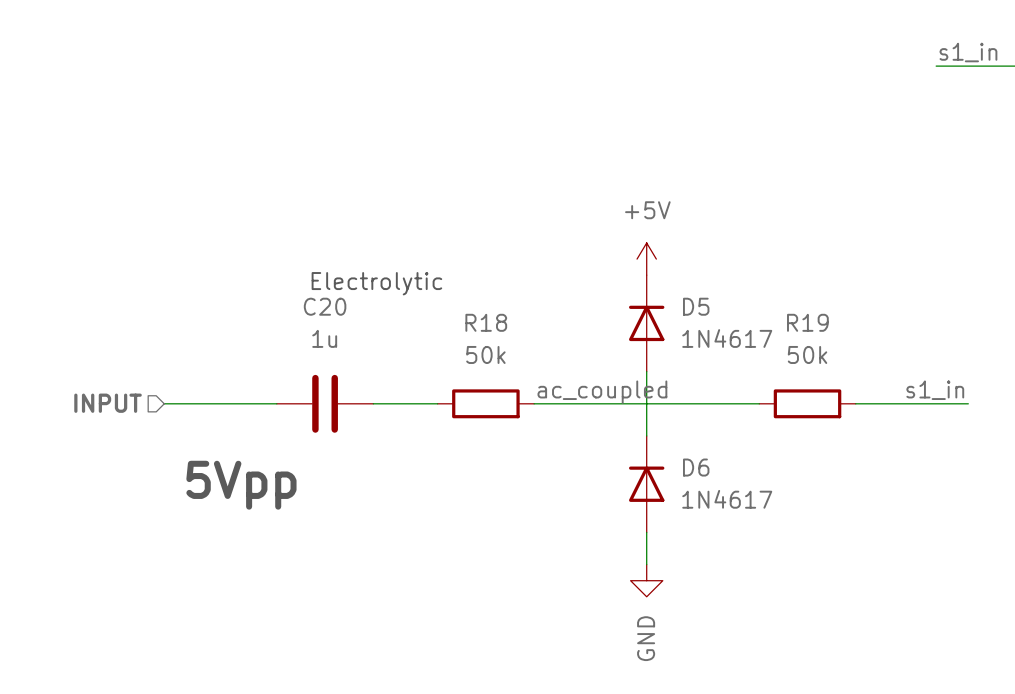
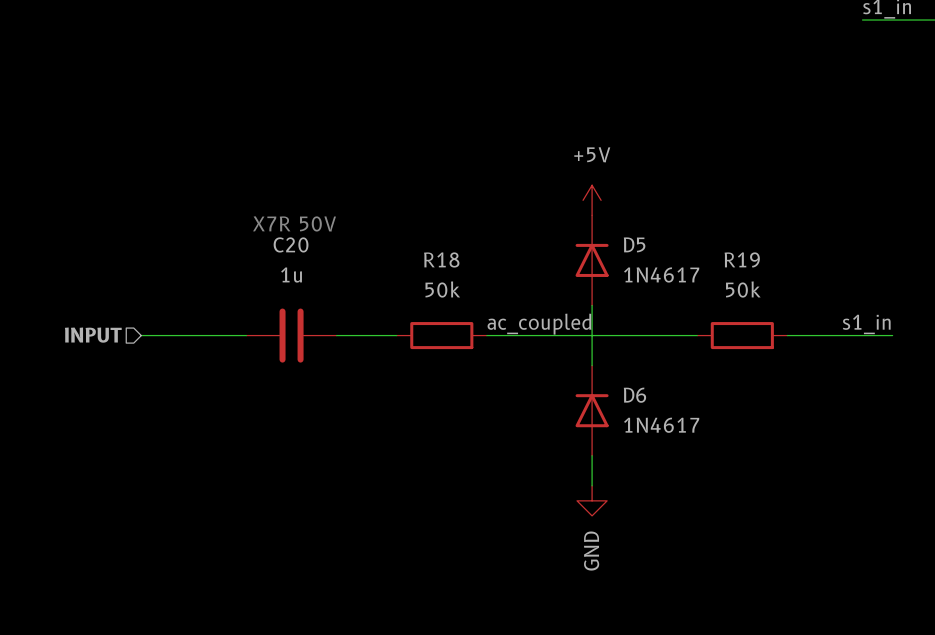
text: Electrolytic (376, 283) -> none
text: none -> X7R 50V (294, 223)
text: 5Vpp (241, 485) -> none

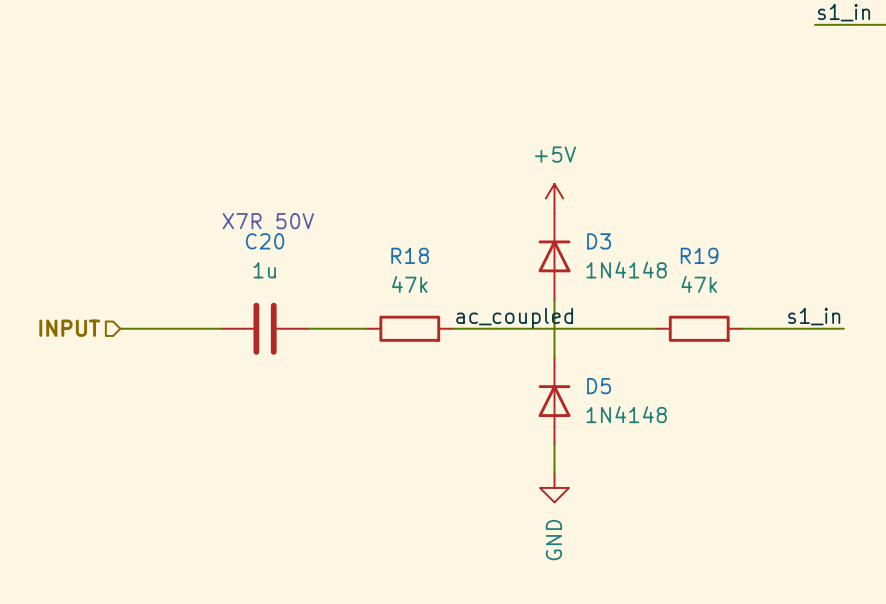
D5 name: D5 (634, 244) -> D3 (599, 241)
D5 value: 1N4617 (661, 274) -> 1N4148 (626, 269)
R18 value: 50k (442, 289) -> 47k (409, 284)
R19 value: 50k (743, 289) -> 47k (699, 284)
D6 name: D6 (634, 395) -> D5 (599, 386)
D6 value: 1N4617 (661, 425) -> 1N4148 (626, 414)

